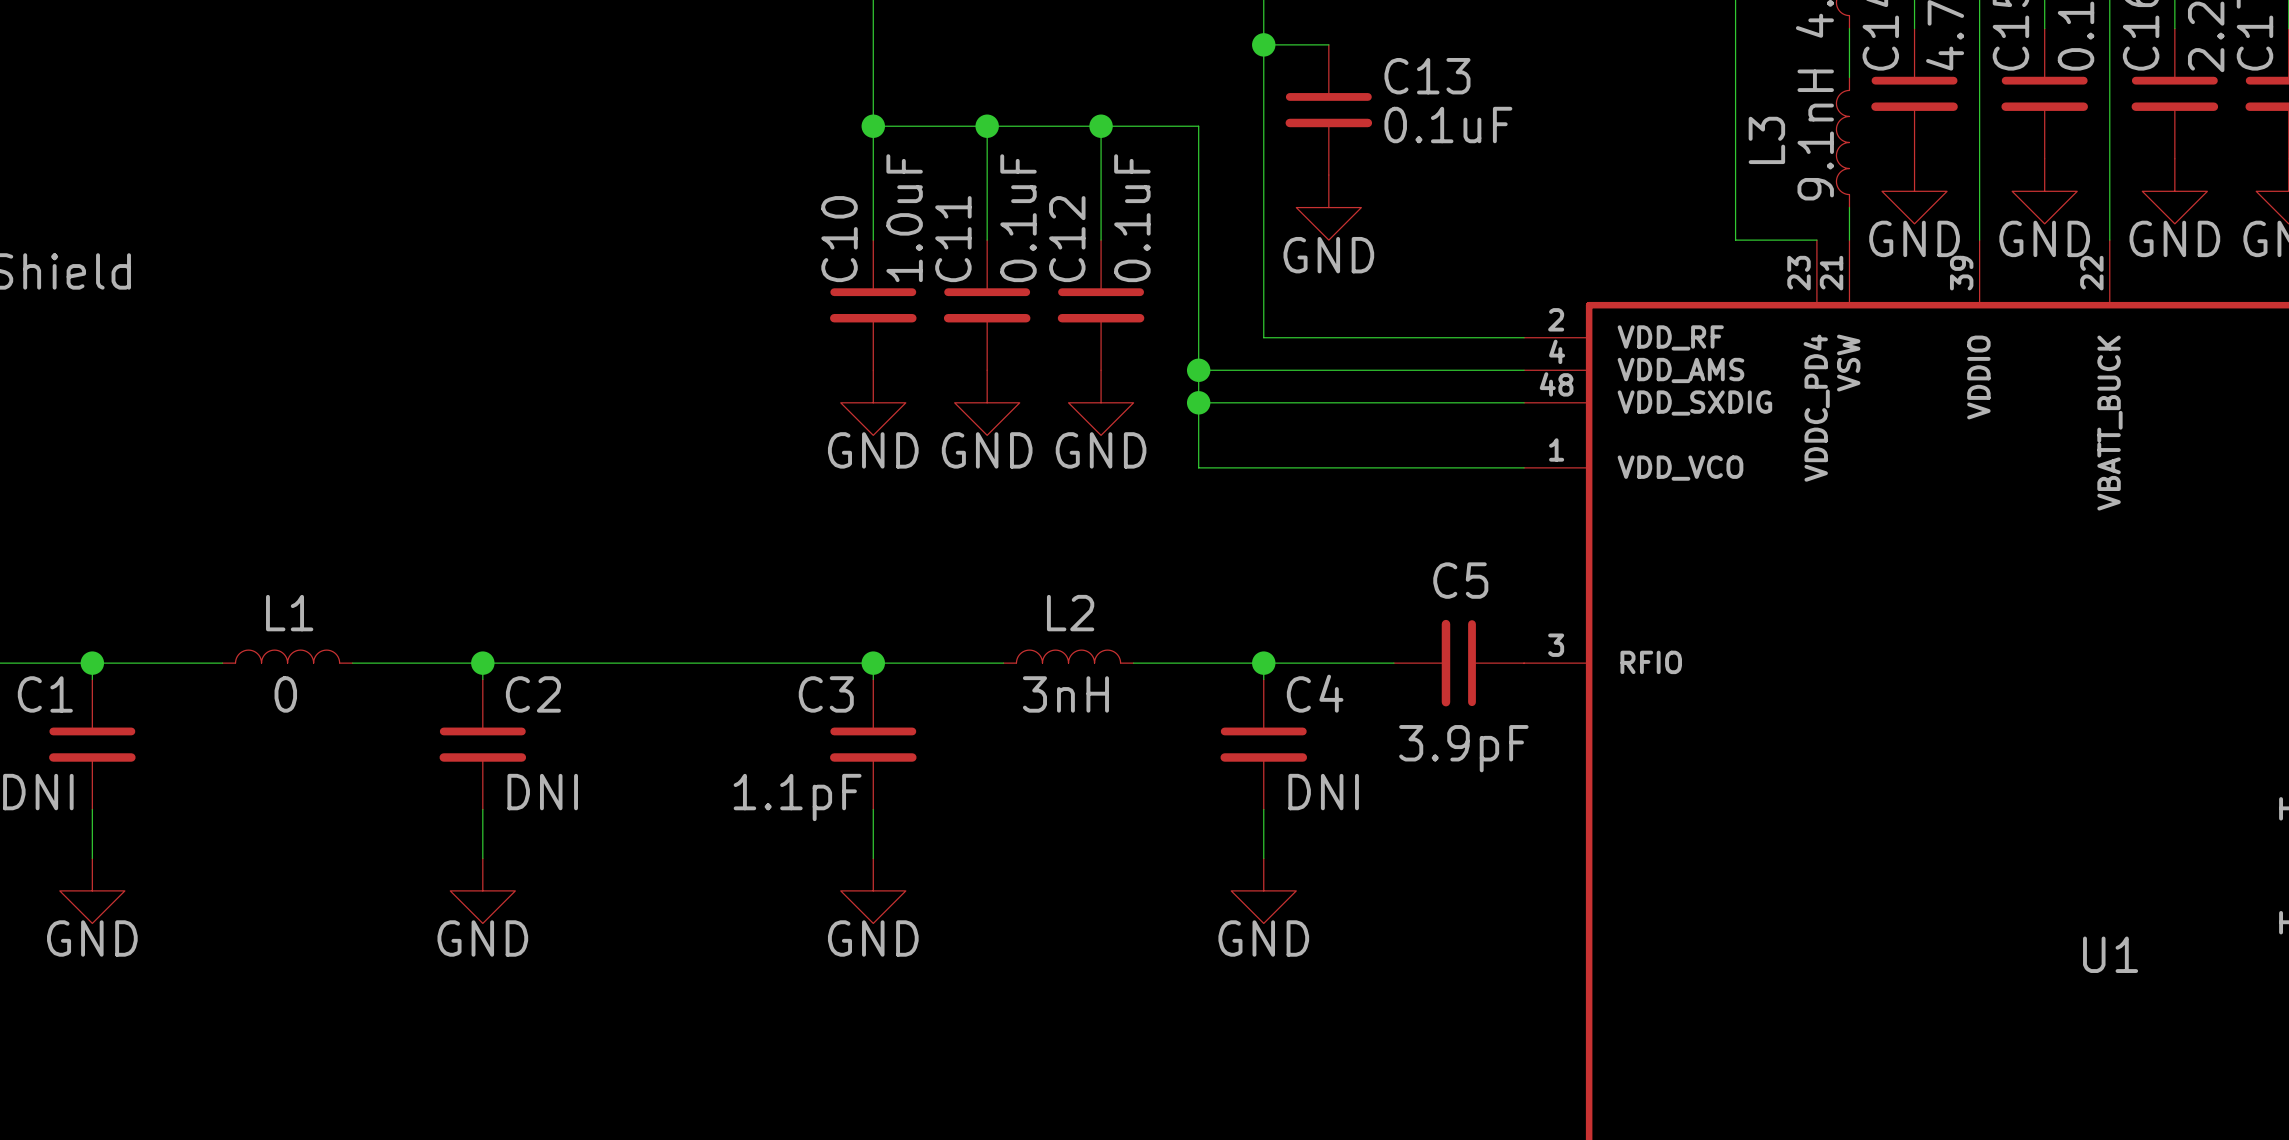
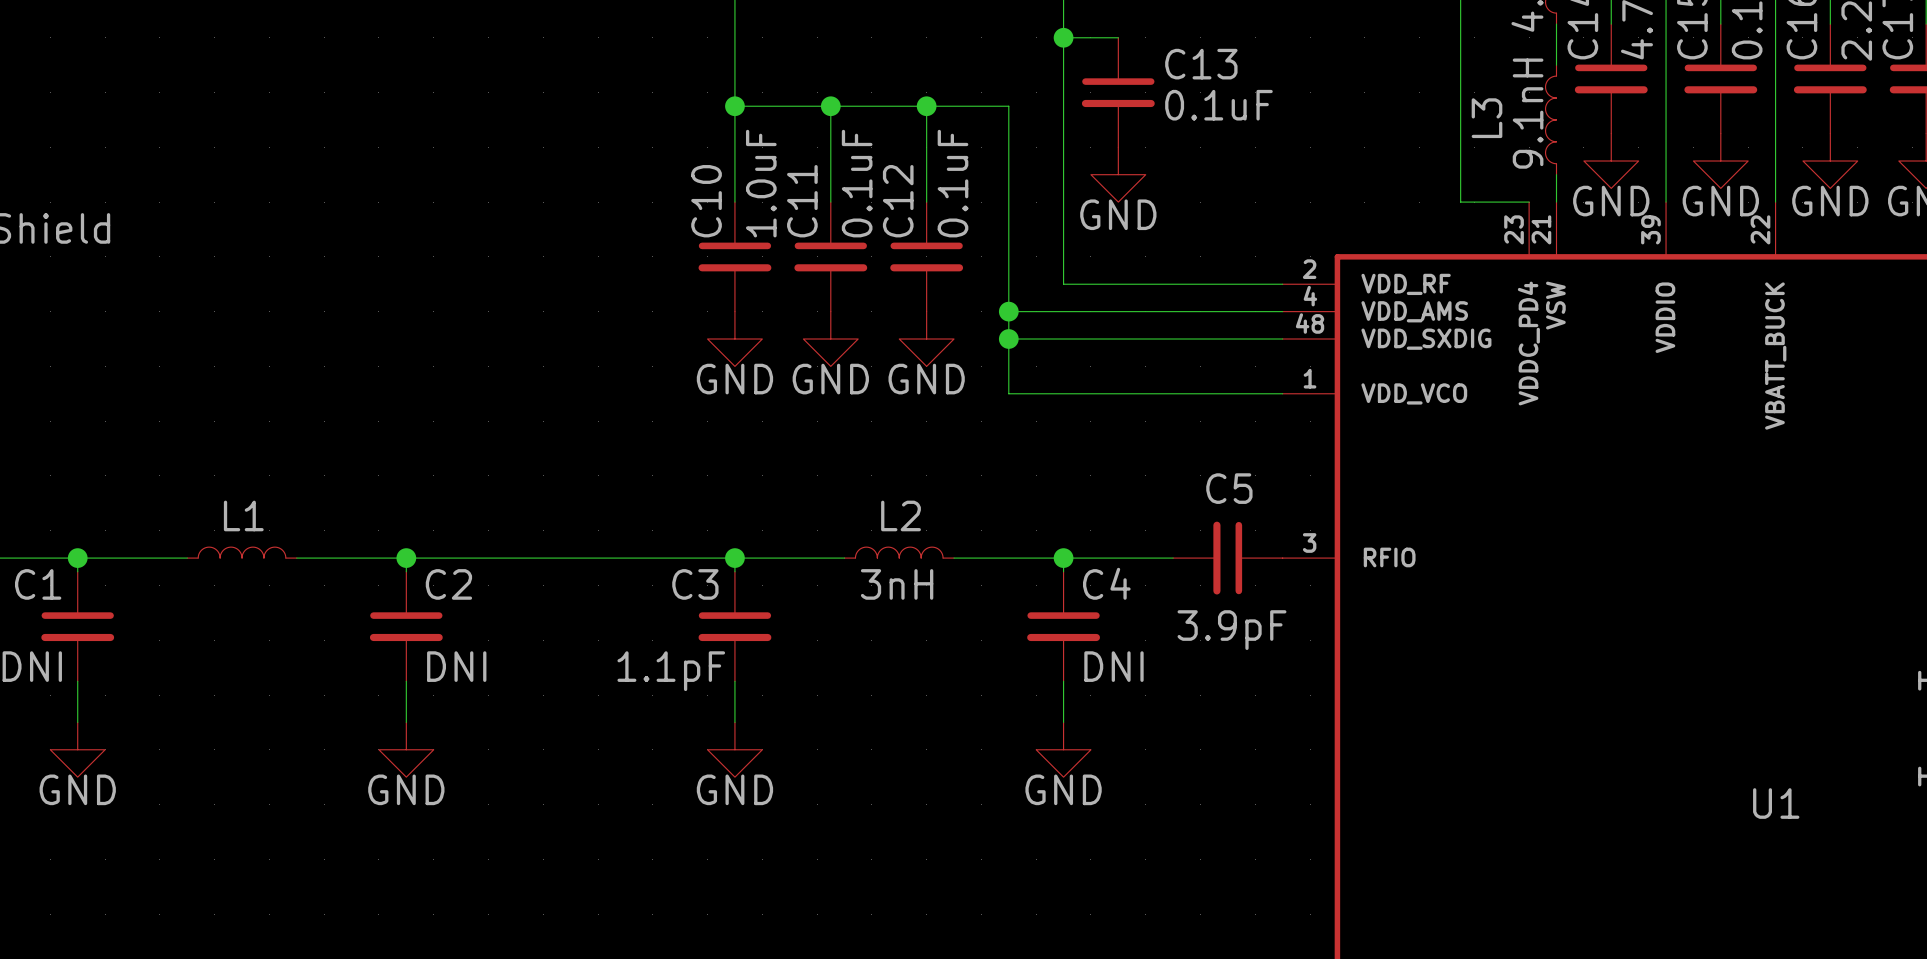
L1 value: 0 (285, 694) -> none

